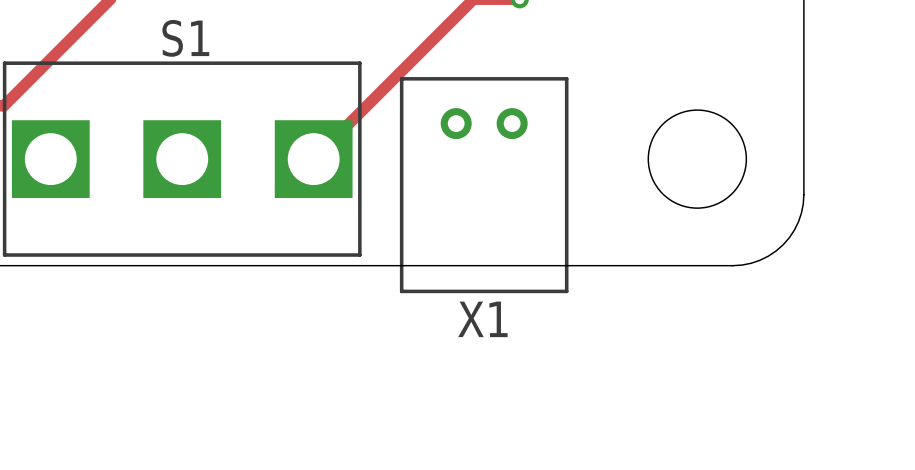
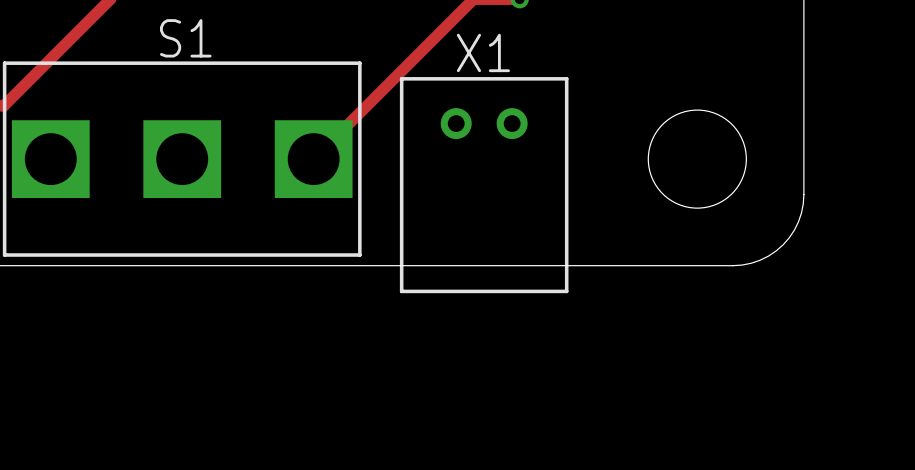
X1 name position: X1 (482, 319) -> X1 (483, 52)

